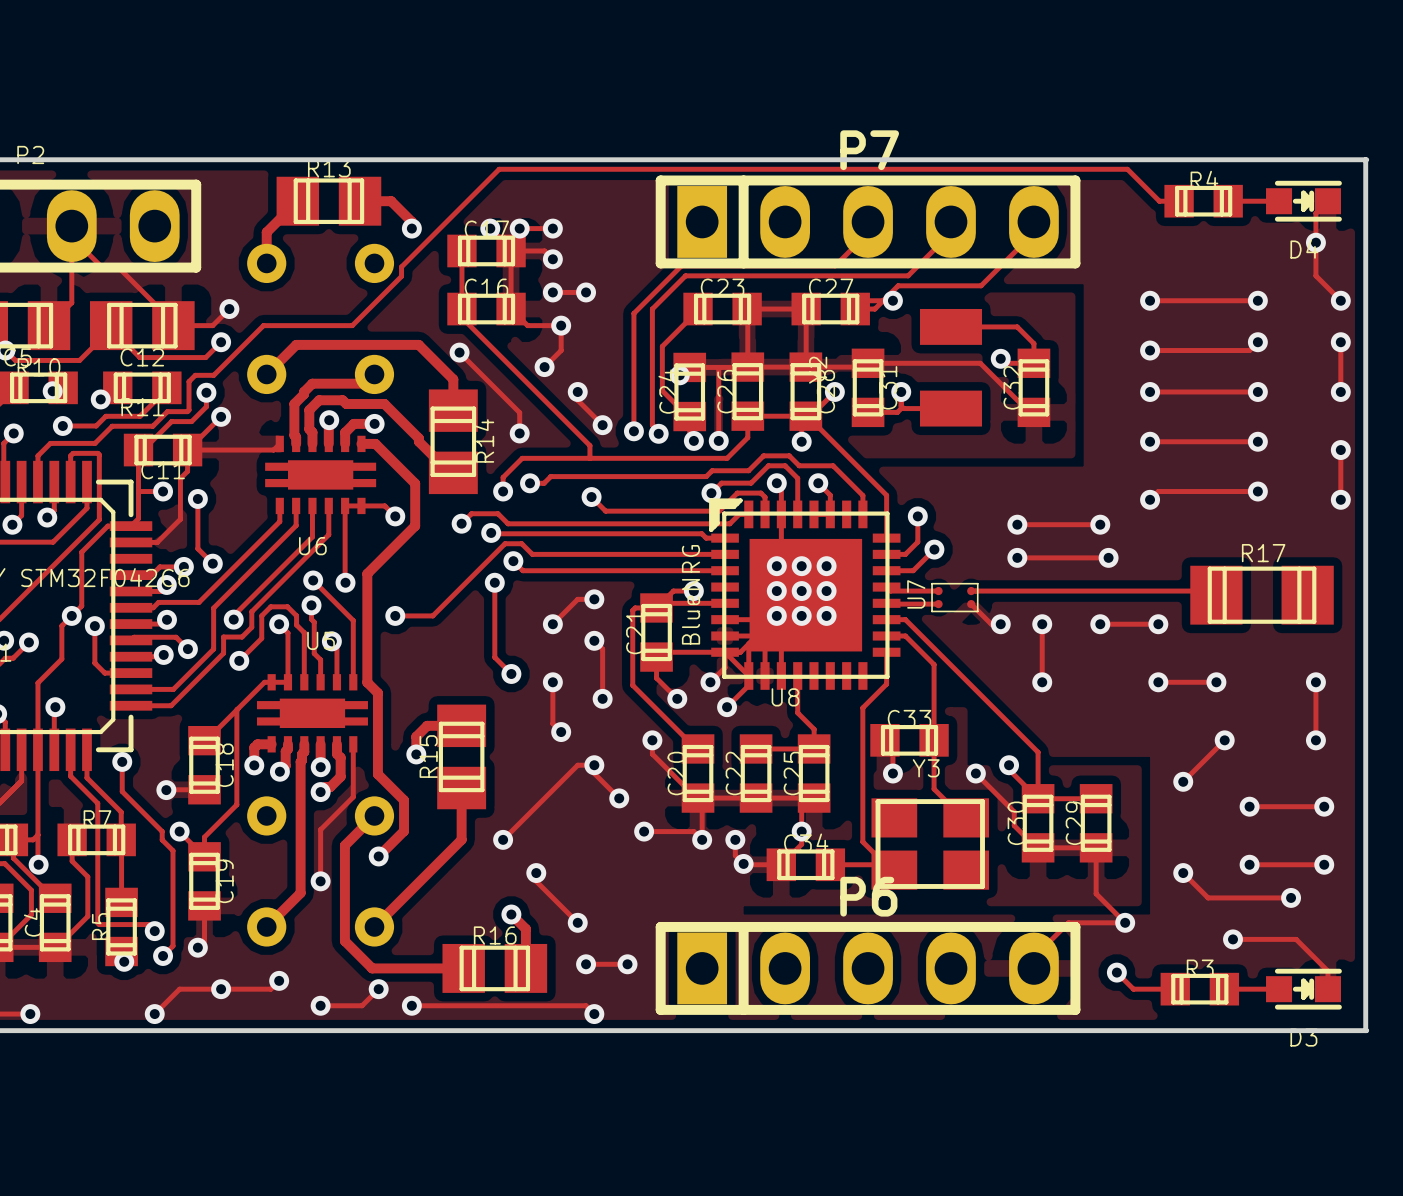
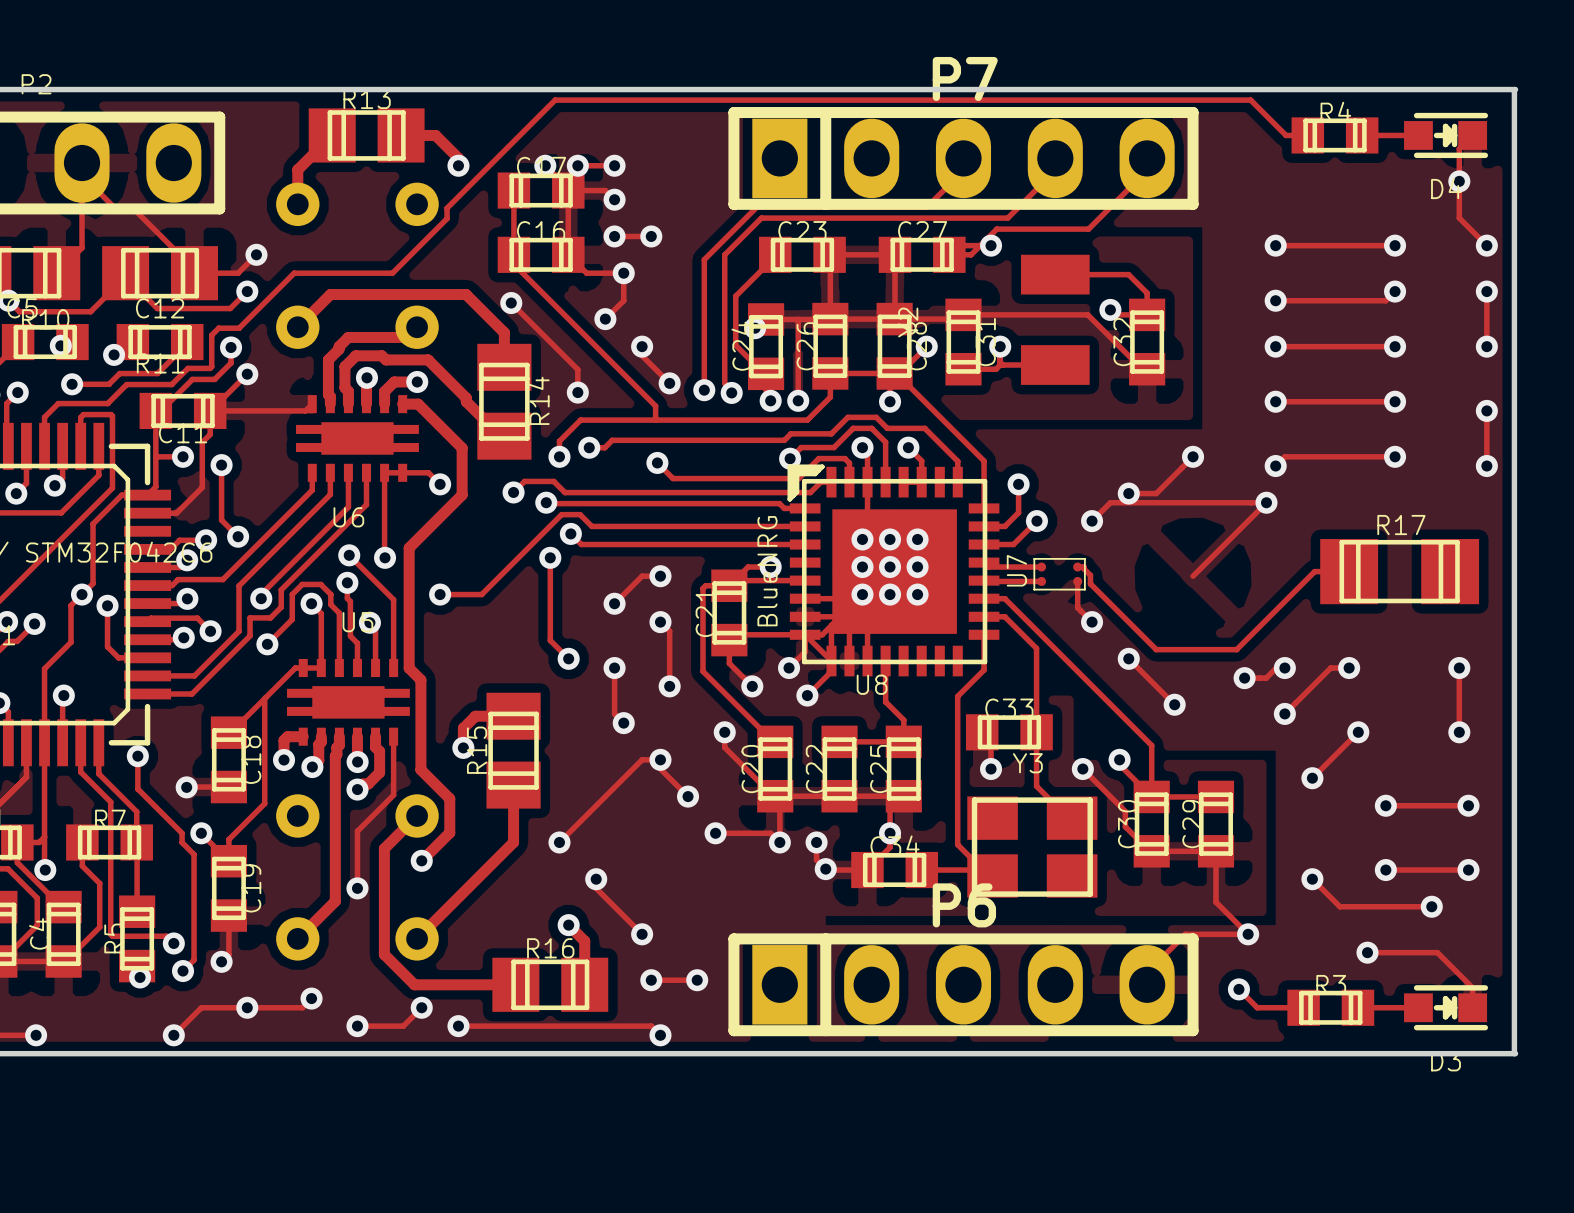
via: none -> (1193, 456)
track: (1042, 524) (1100, 524) -> (1156, 493) (1193, 456)
via: (1100, 524) -> none
via: none -> (1266, 502)
track: none -> (1092, 521) (1110, 502) (1266, 502) (1193, 576)
track: (1017, 557) (1108, 557) -> none
via position: (1017, 557) -> (1092, 521)
via: (1108, 557) -> none
track: (976, 591) (1215, 591) (1216, 595) -> (1084, 567) (1090, 575) (1090, 583) (1156, 649) (1236, 649) (1314, 571) (1349, 571)
track: (971, 604) (991, 624) (1000, 624) -> (1077, 581) (1077, 607) (1092, 622)
via position: (1000, 624) -> (1092, 622)
track: (1042, 624) (1042, 682) -> none
via: (1042, 624) -> none
track: (1100, 624) (1158, 624) -> none
via: (1100, 624) -> none
via: (1158, 624) -> none
track: none -> (1128, 658) (1174, 704)
via: none -> (1128, 658)
track: none -> (1282, 662) (1266, 678) (1244, 678)
via: (1042, 682) -> none
track: (1158, 682) (1199, 682) -> (1284, 713) (1330, 668)
via: none -> (1244, 678)
via: none -> (1174, 704)
via: none -> (1284, 713)

